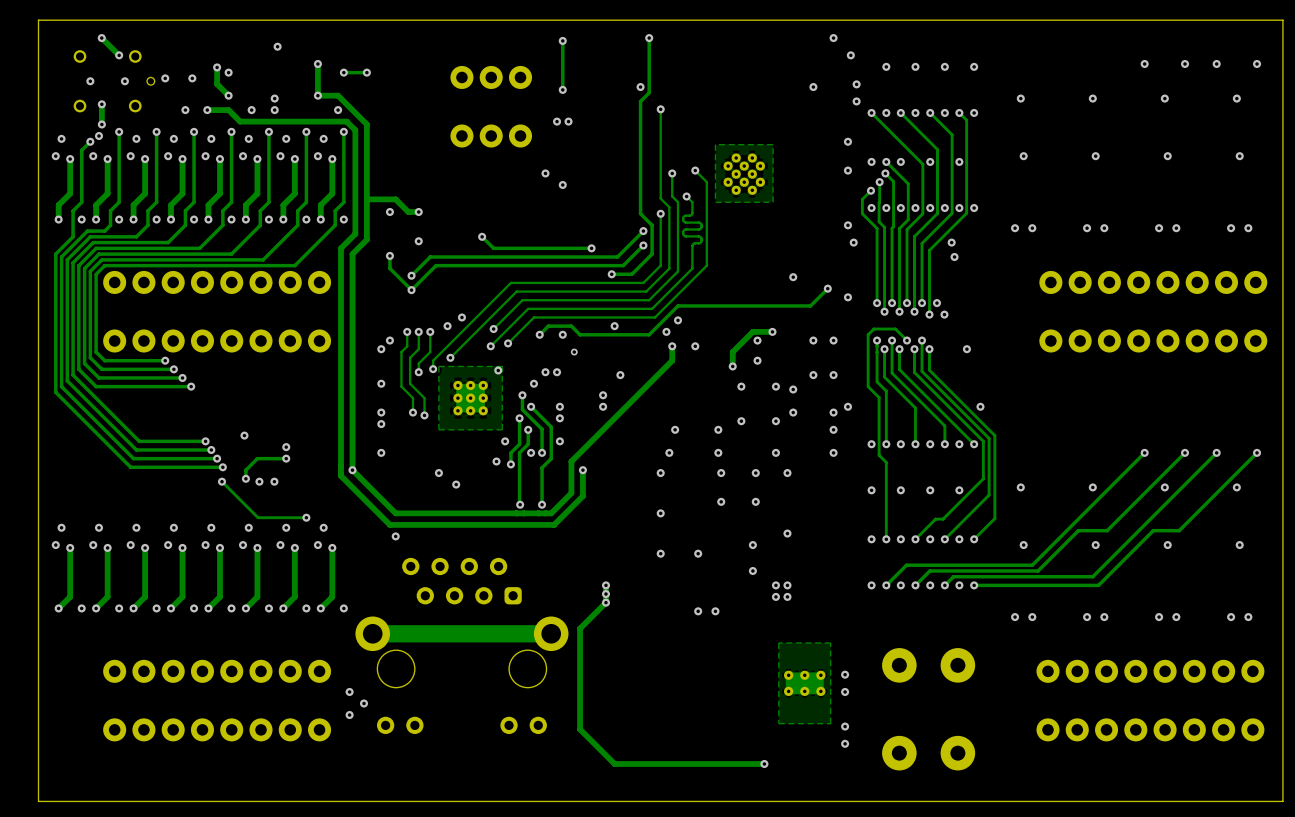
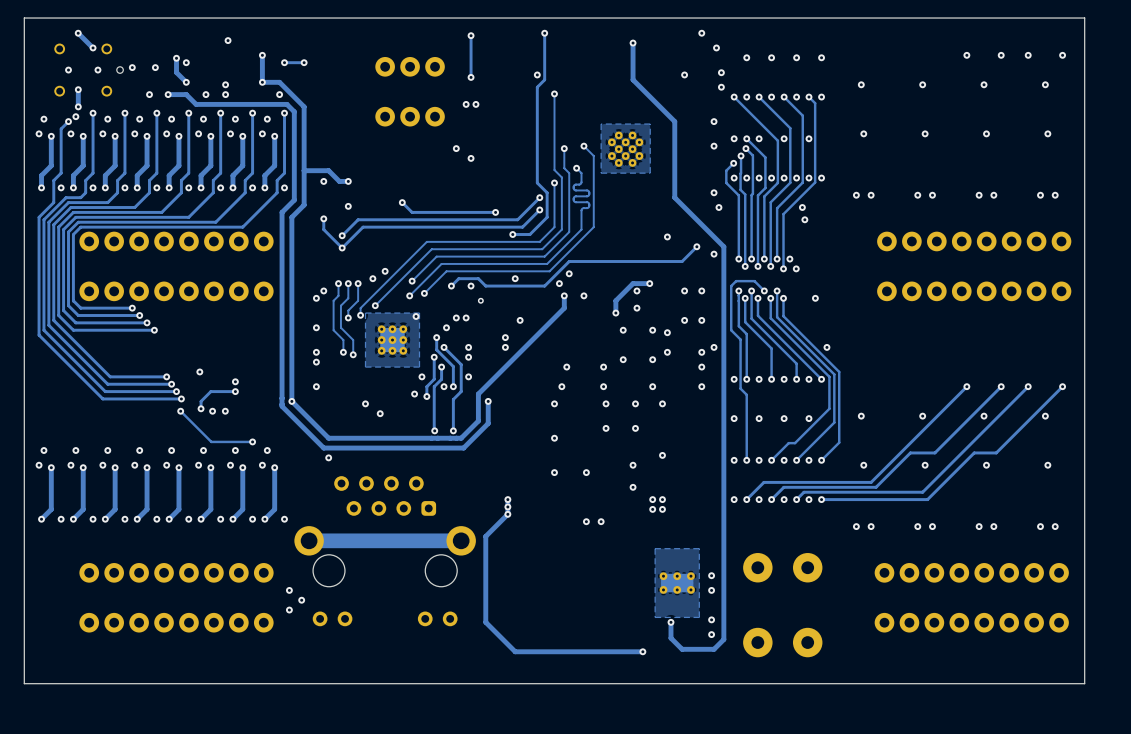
track: none -> (633, 43) (633, 79) (674, 121) (674, 197) (723, 246) (723, 639) (714, 649) (682, 649) (670, 638) (670, 622)
via: none -> (633, 43)
via: none -> (670, 622)

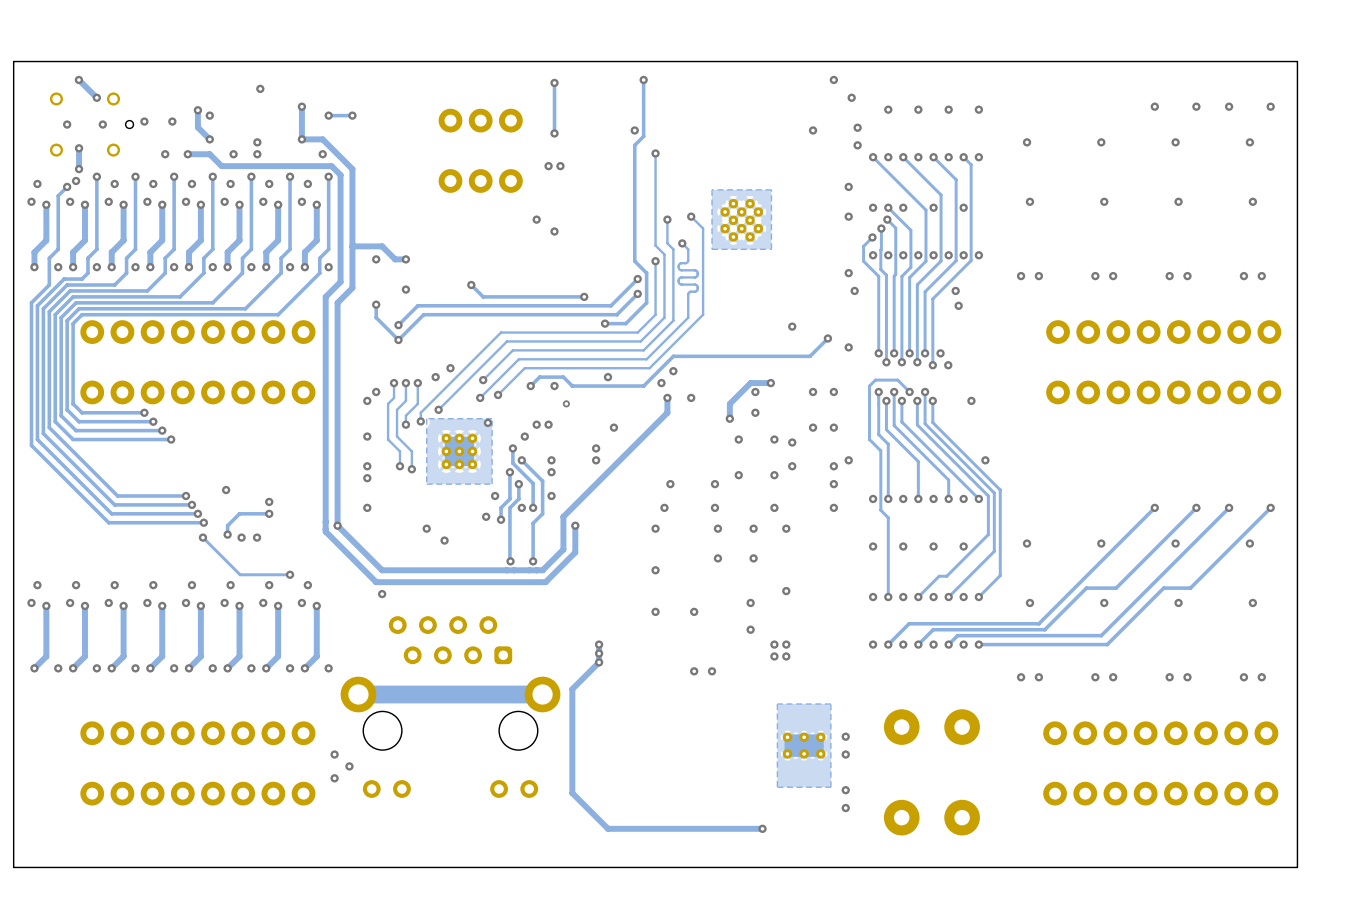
track: (633, 43) (633, 79) (674, 121) (674, 197) (723, 246) (723, 639) (714, 649) (682, 649) (670, 638) (670, 622) -> none
via: (633, 43) -> none
via: (670, 622) -> none

